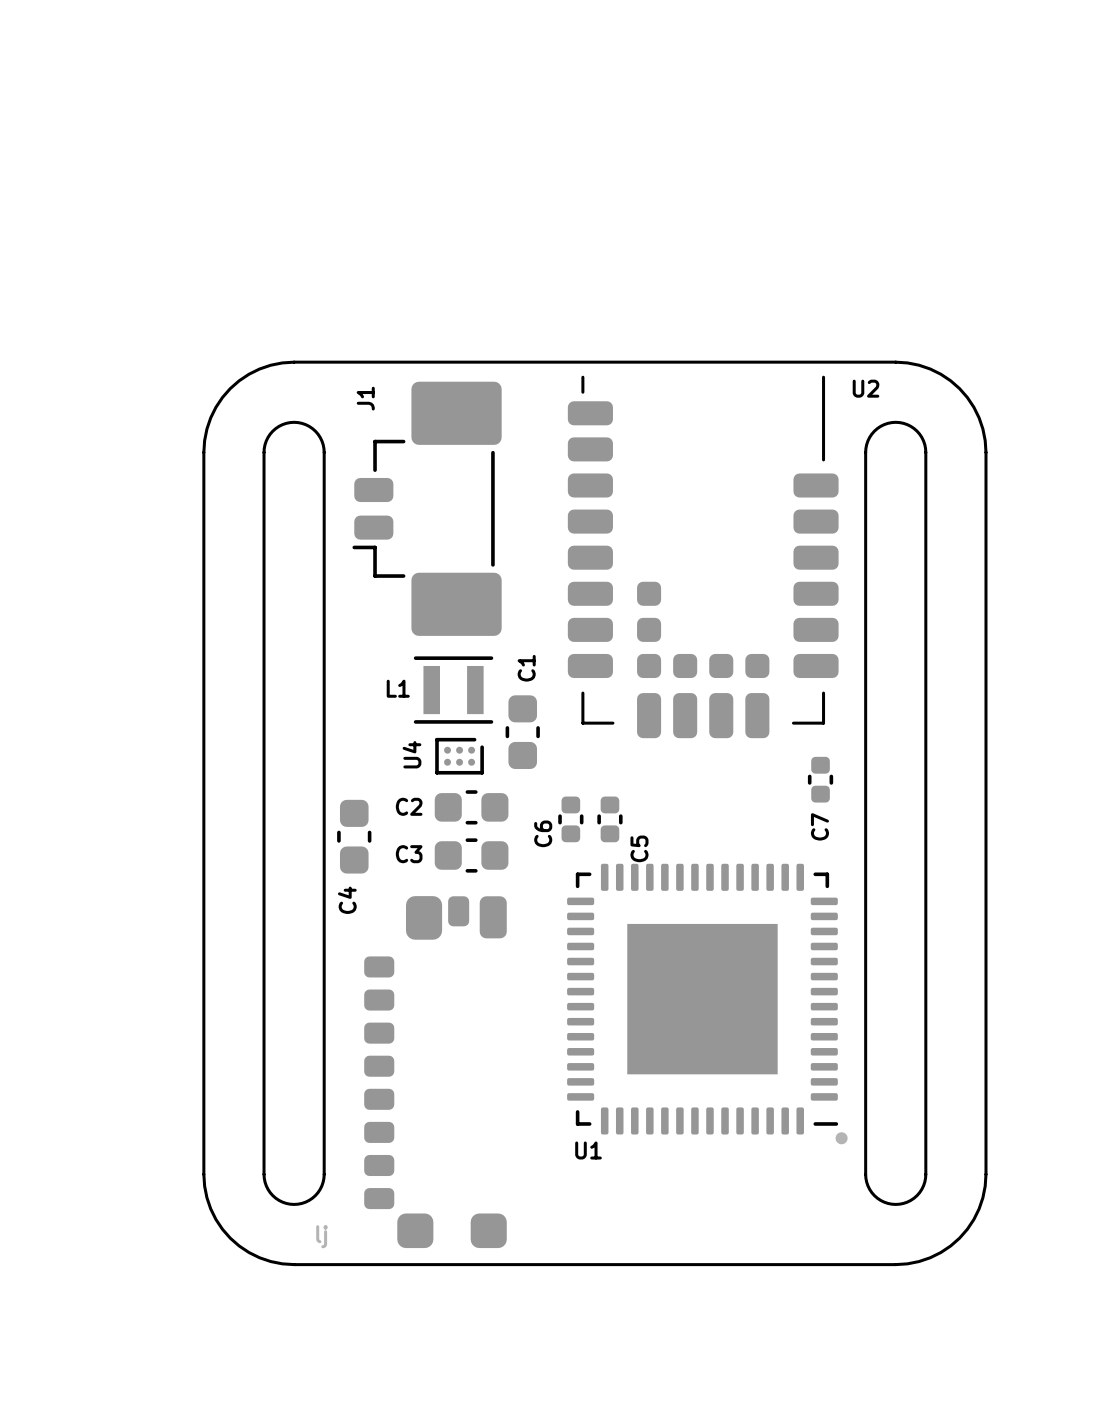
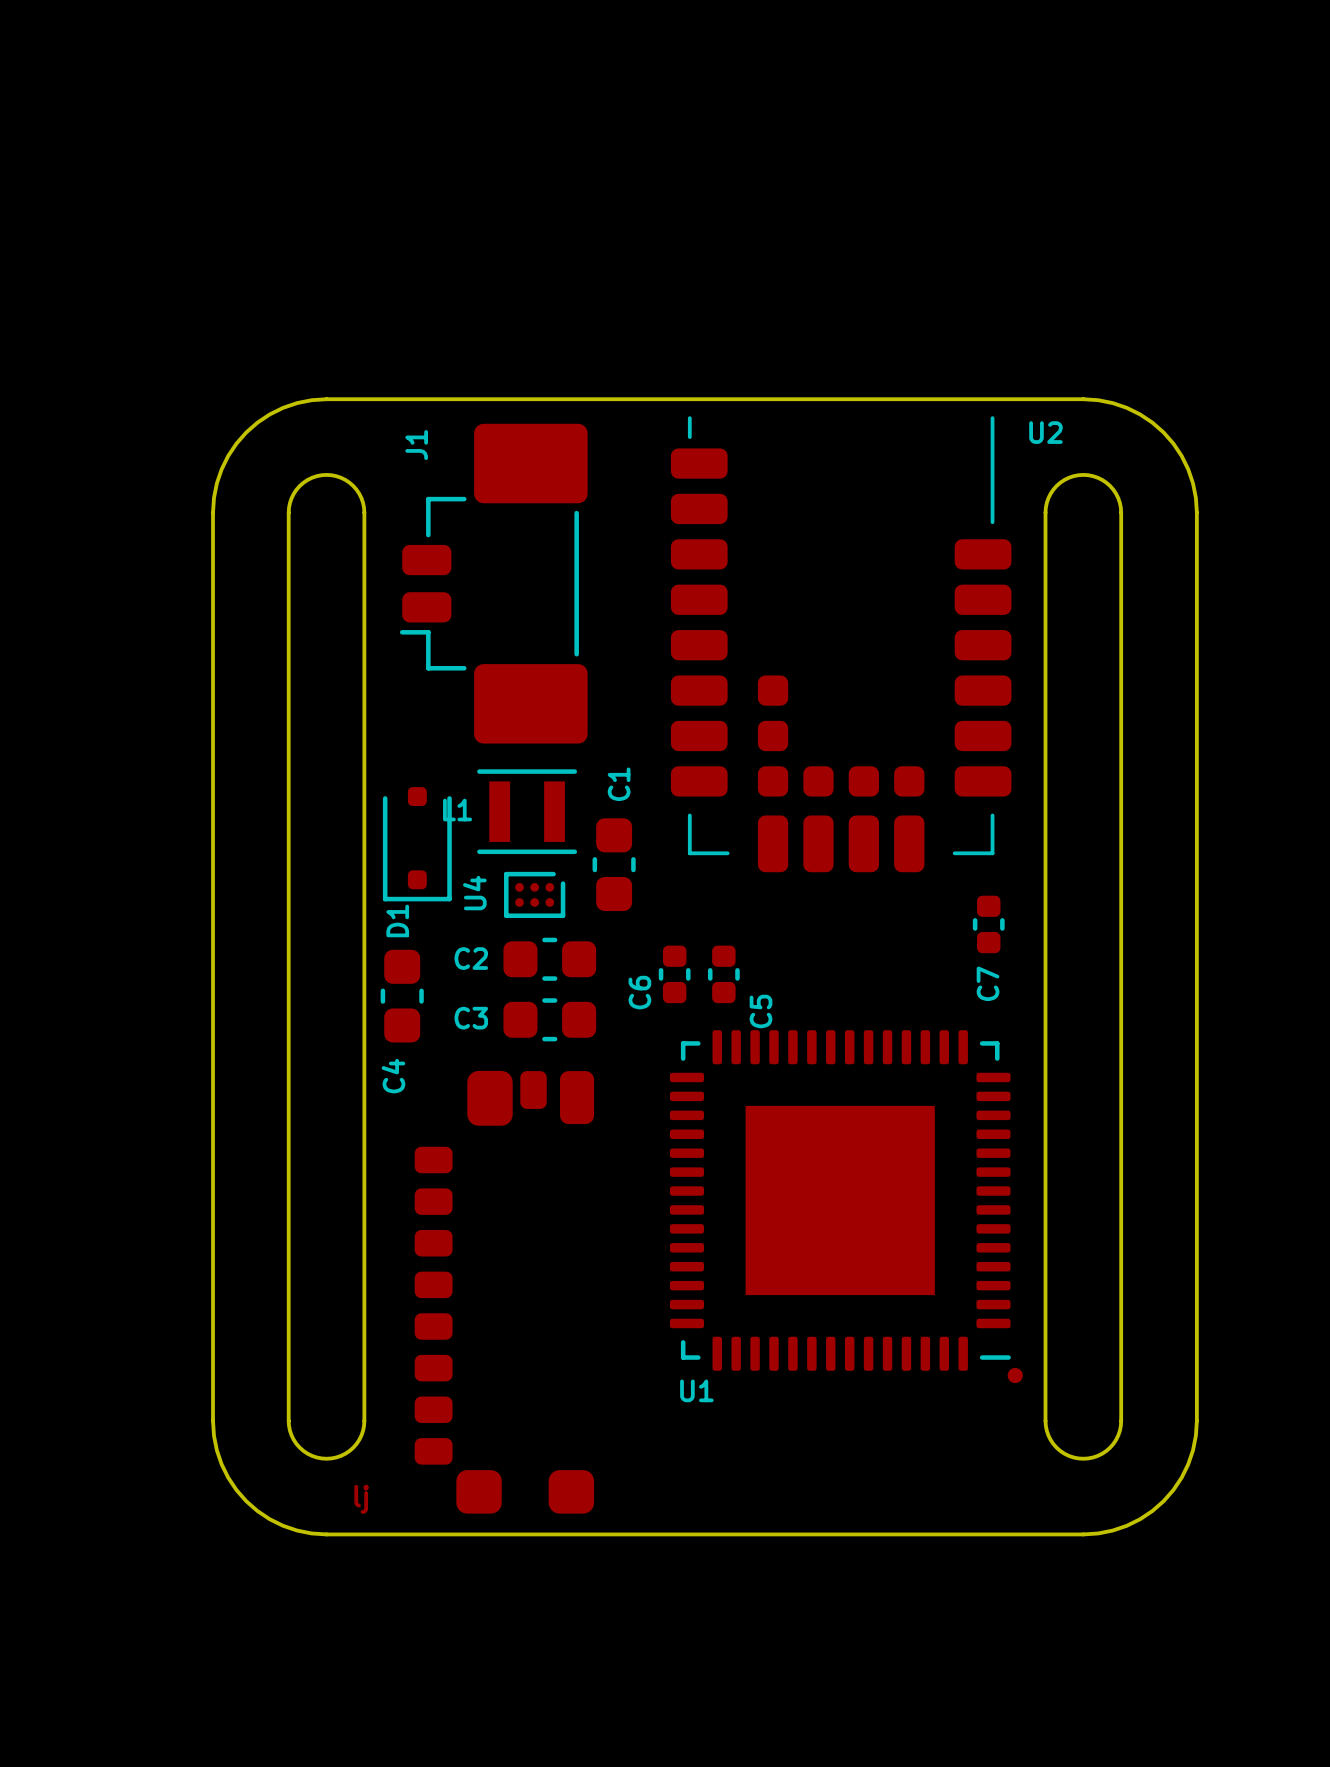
D1: none -> (417, 844)

